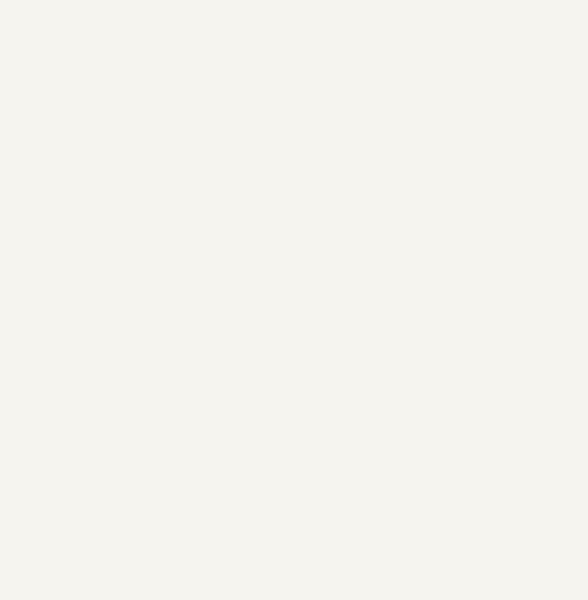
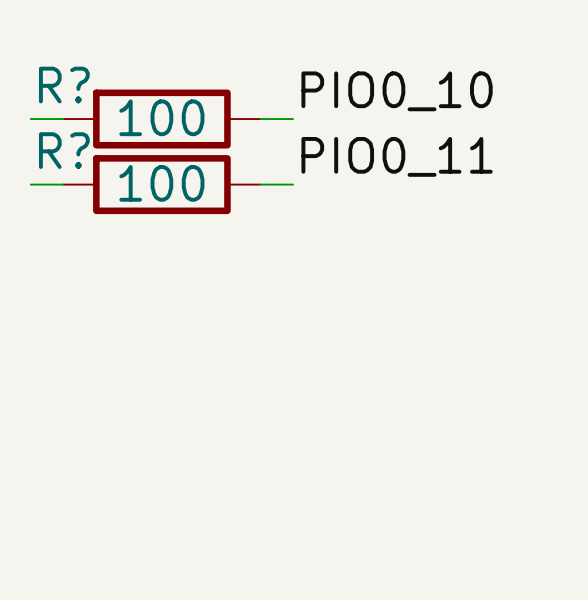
label: none -> PIO0_10 (397, 91)
wire: none -> (30, 119) (63, 119)
R?: none -> 100 (161, 119)
wire: none -> (260, 119) (293, 119)
label: none -> PIO0_11 (397, 156)
wire: none -> (30, 184) (63, 184)
R?: none -> 100 (161, 184)
wire: none -> (260, 184) (293, 184)

